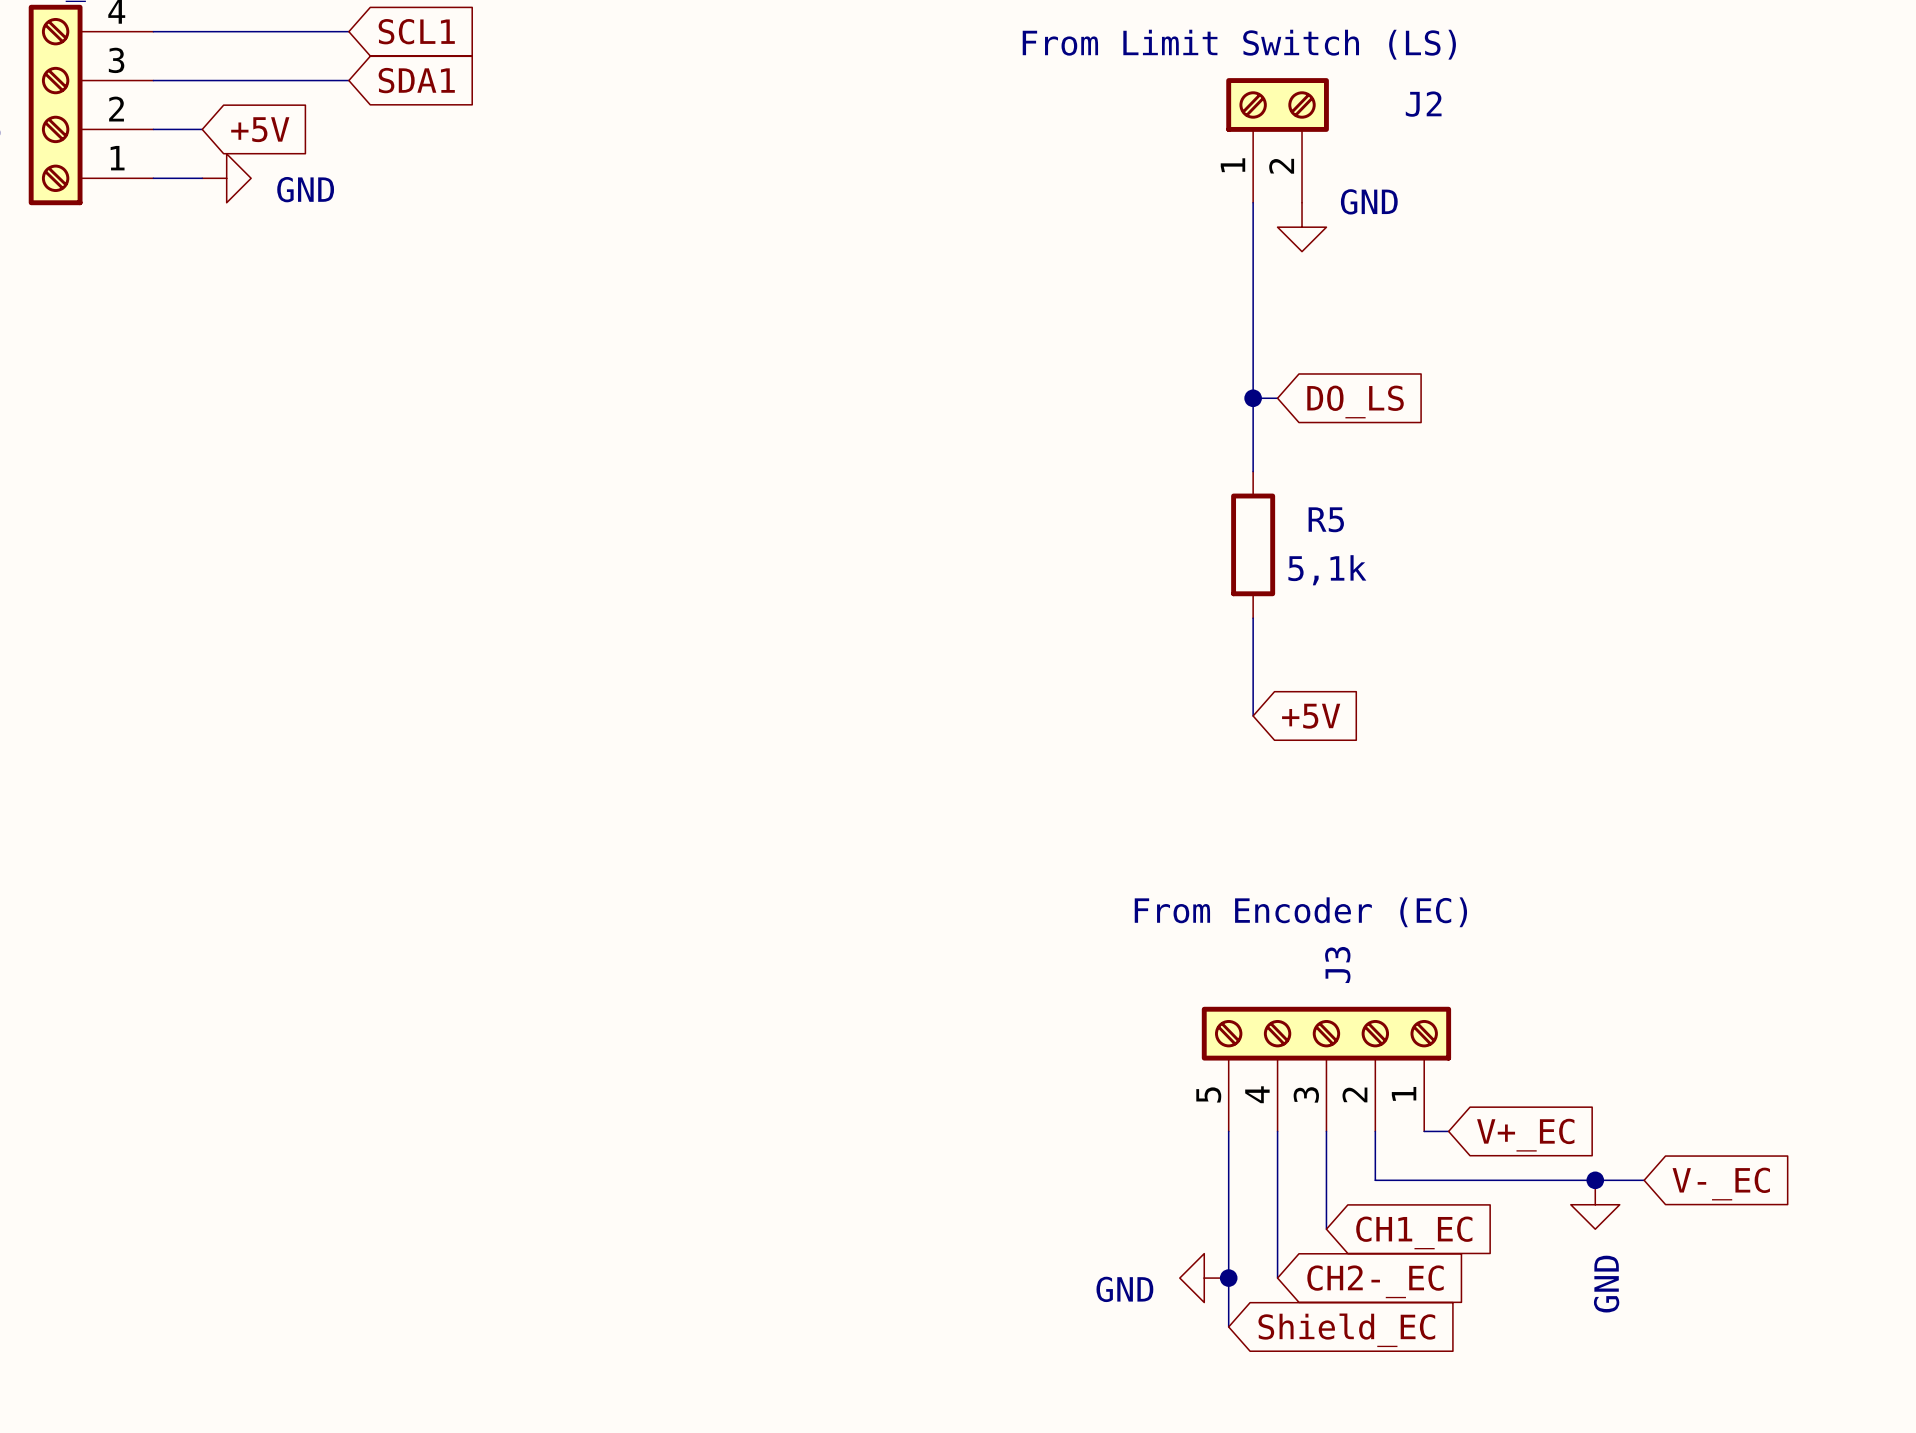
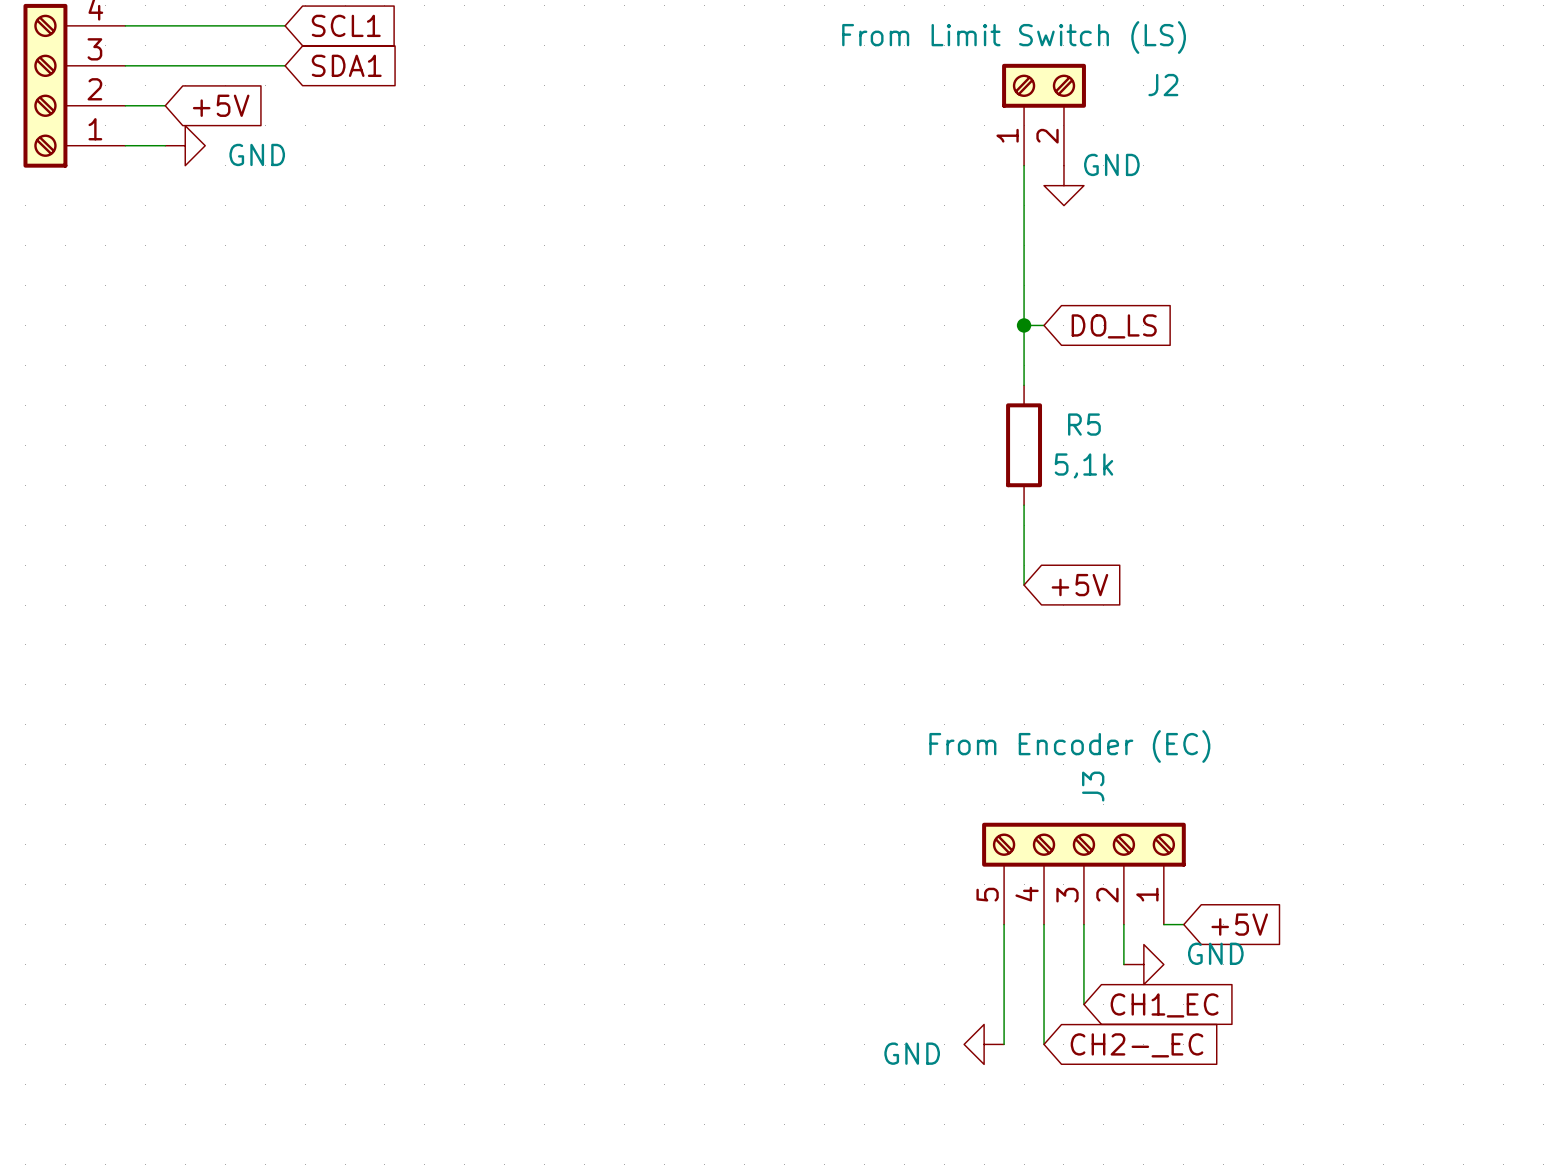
global label: V+_EC (1525, 1135) -> +5V (1239, 924)
wire: (1375, 1180) (1644, 1180) -> none
junction: (1595, 1180) -> none
global label: V-_EC (1721, 1184) -> none
power symbol rotation: 0° (1595, 1204) -> 90° counterclockwise (1143, 964)
power symbol position: GND (1595, 1204) -> GND (1143, 964)
wire: (1228, 1278) (1228, 1326) -> none
junction: (1228, 1278) -> none
global label: Shield_EC (1346, 1330) -> none

